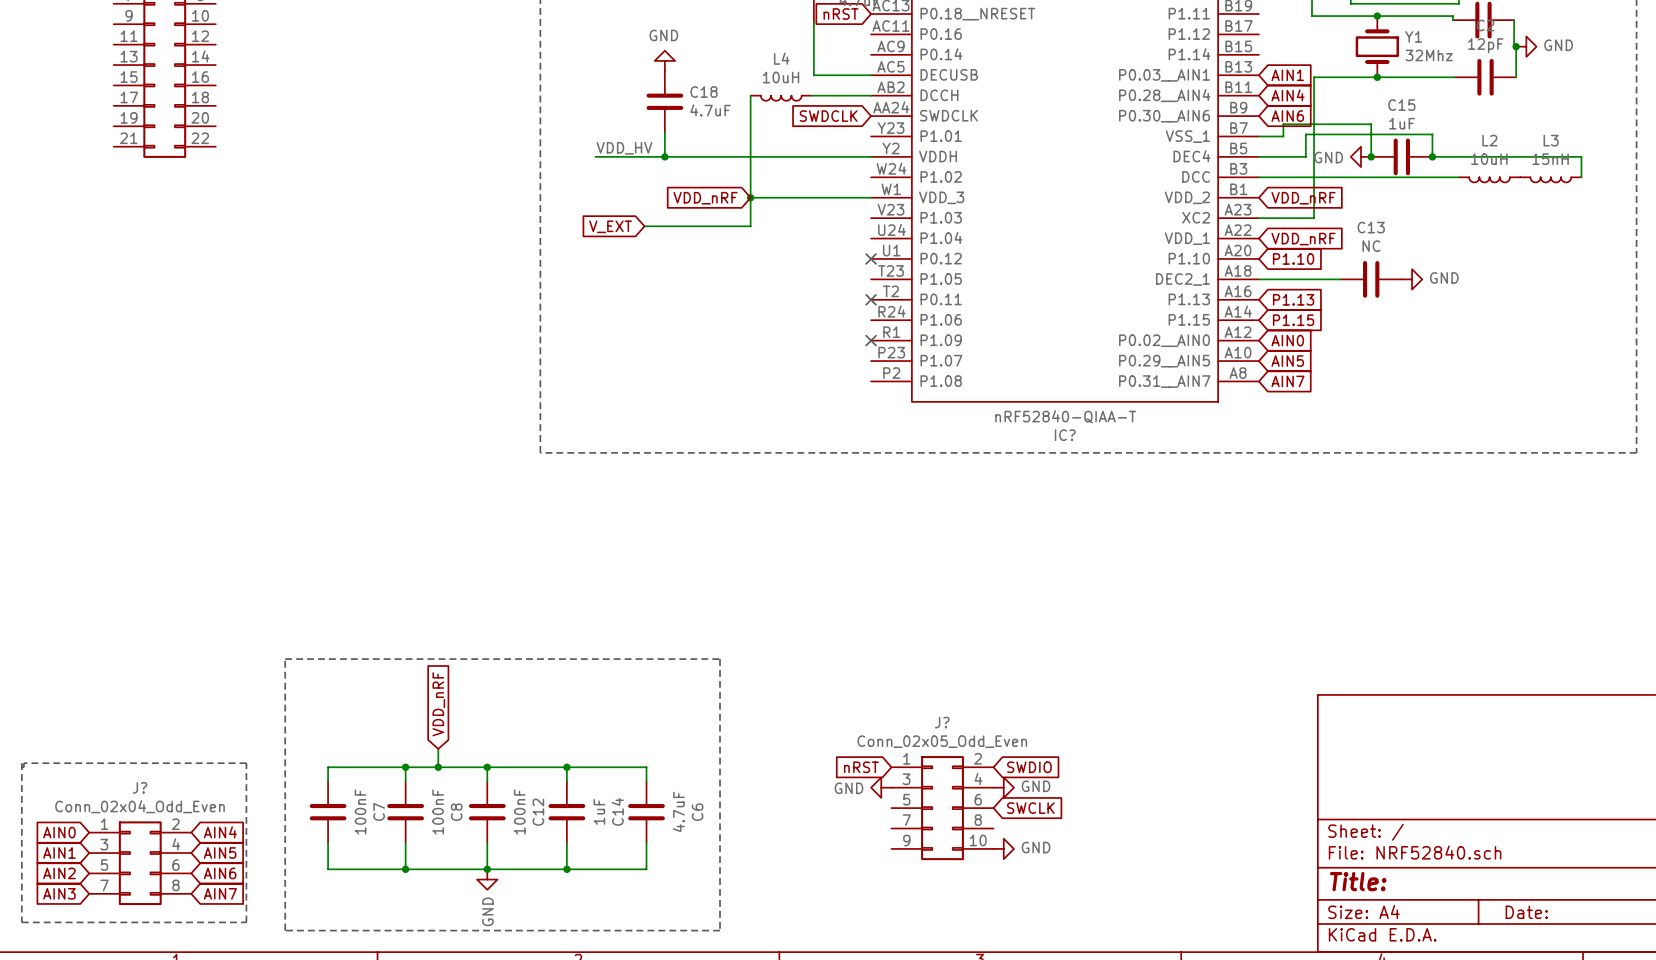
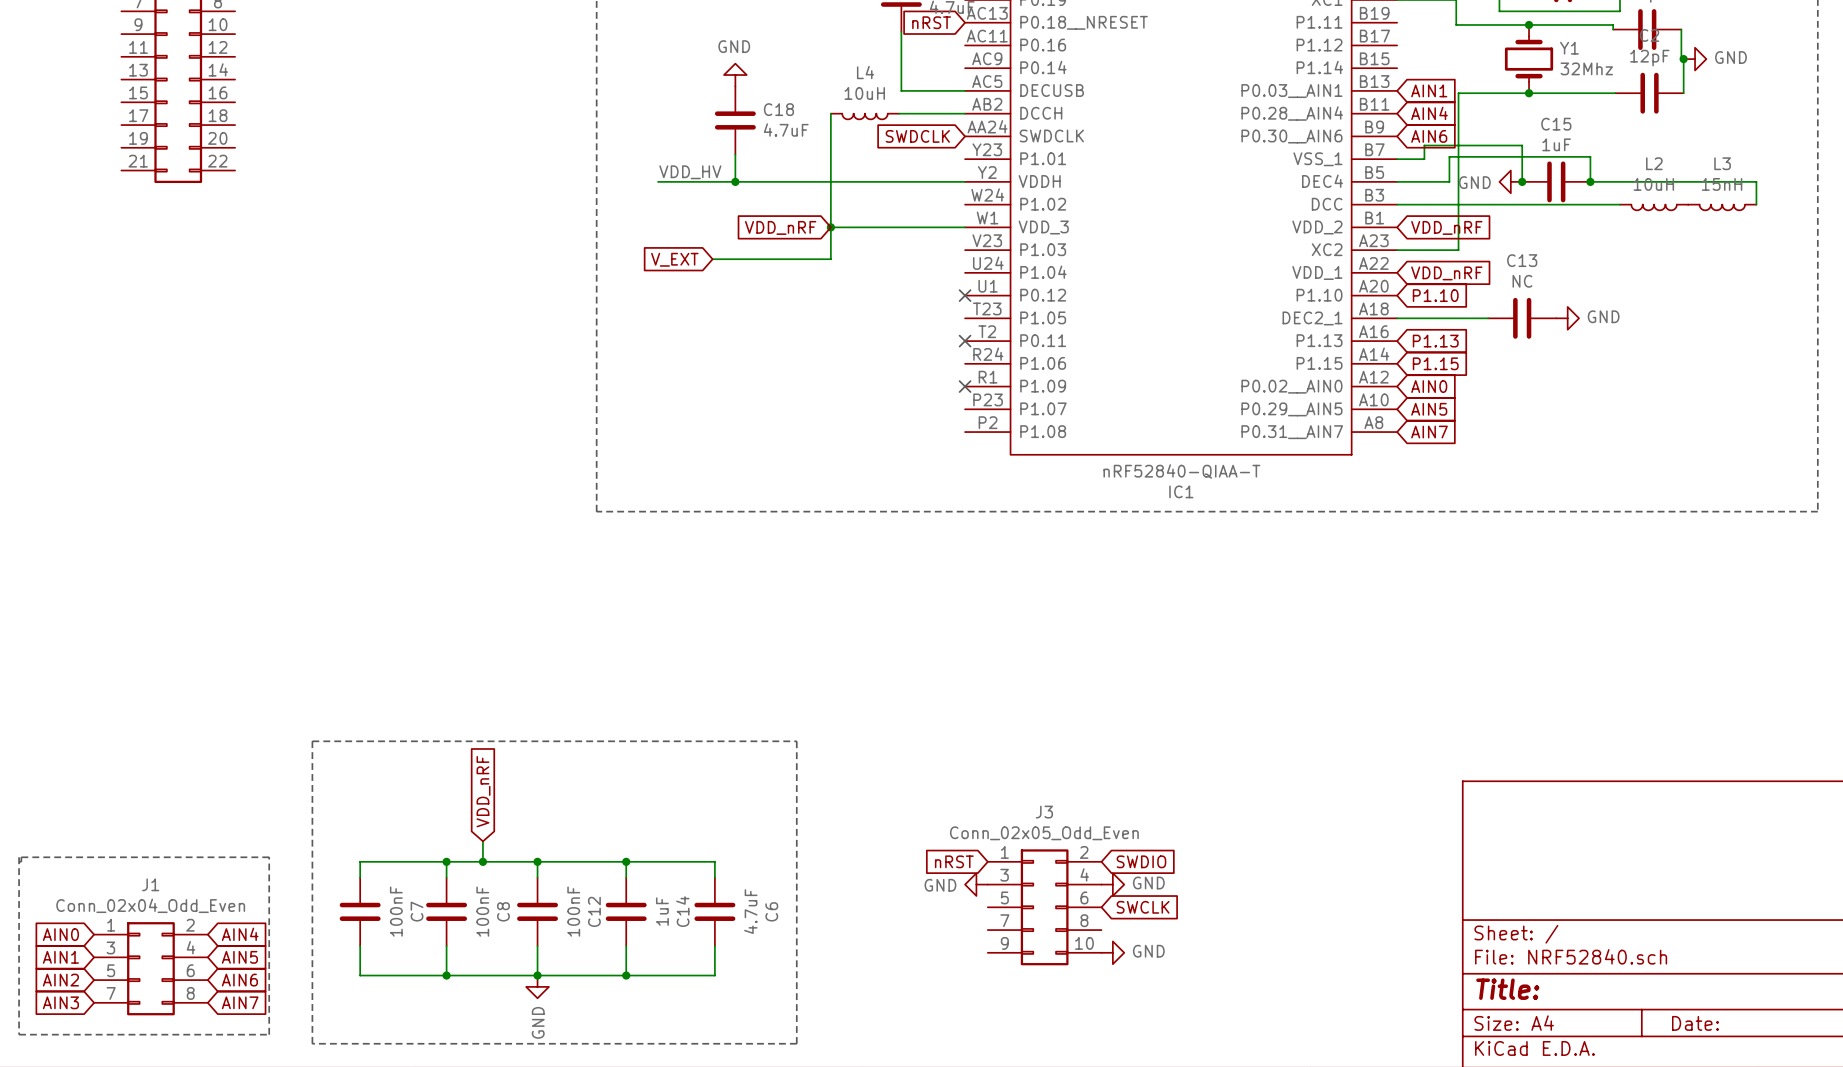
IC? name: IC? (1065, 435) -> IC1 (1181, 491)
J? name: J? (942, 722) -> J3 (1044, 812)
J? name: J? (140, 787) -> J1 (150, 884)

